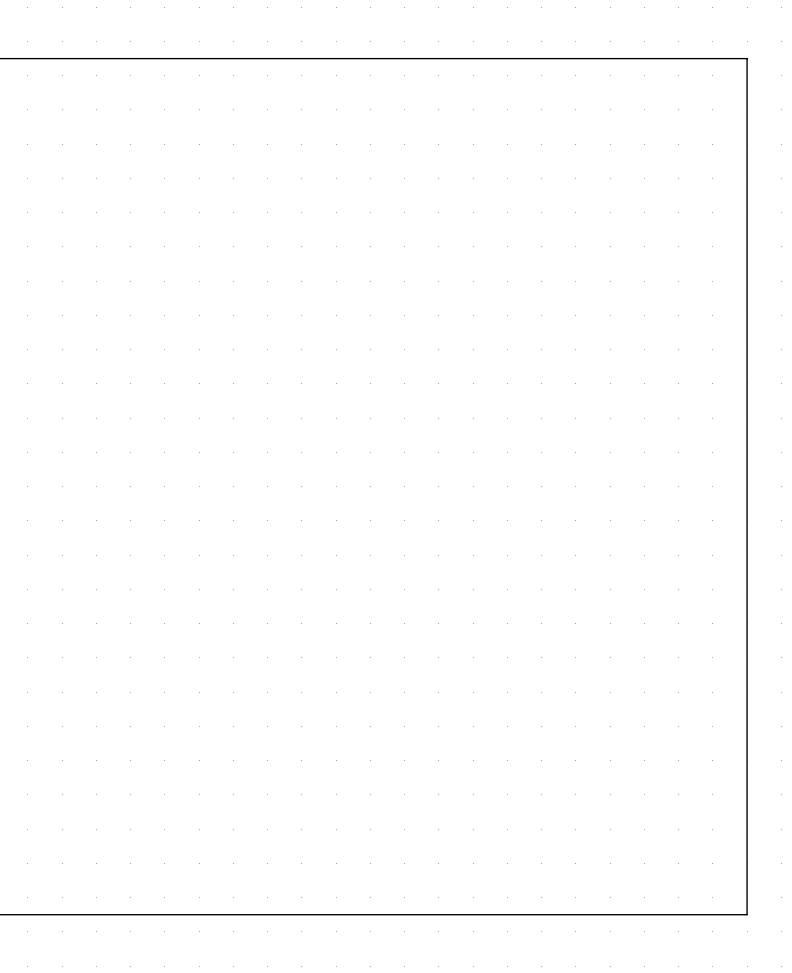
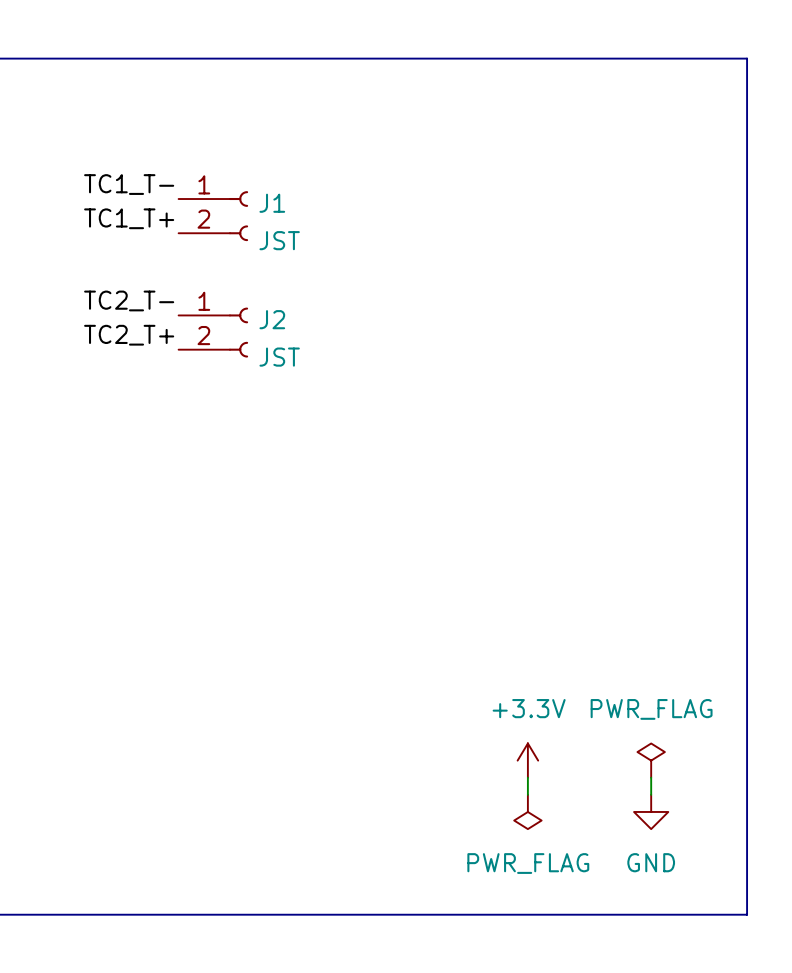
label: none -> TC1_T- (129, 184)
J1: none -> JST (213, 216)
label: none -> TC1_T+ (129, 218)
label: none -> TC2_T- (129, 300)
J2: none -> JST (213, 332)
label: none -> TC2_T+ (129, 335)
power symbol: none -> +3.3V (527, 760)
power symbol: none -> PWR_FLAG (651, 760)
wire: none -> (527, 777) (527, 794)
wire: none -> (651, 777) (651, 794)
power symbol: none -> PWR_FLAG (527, 811)
power symbol: none -> GND (651, 811)

